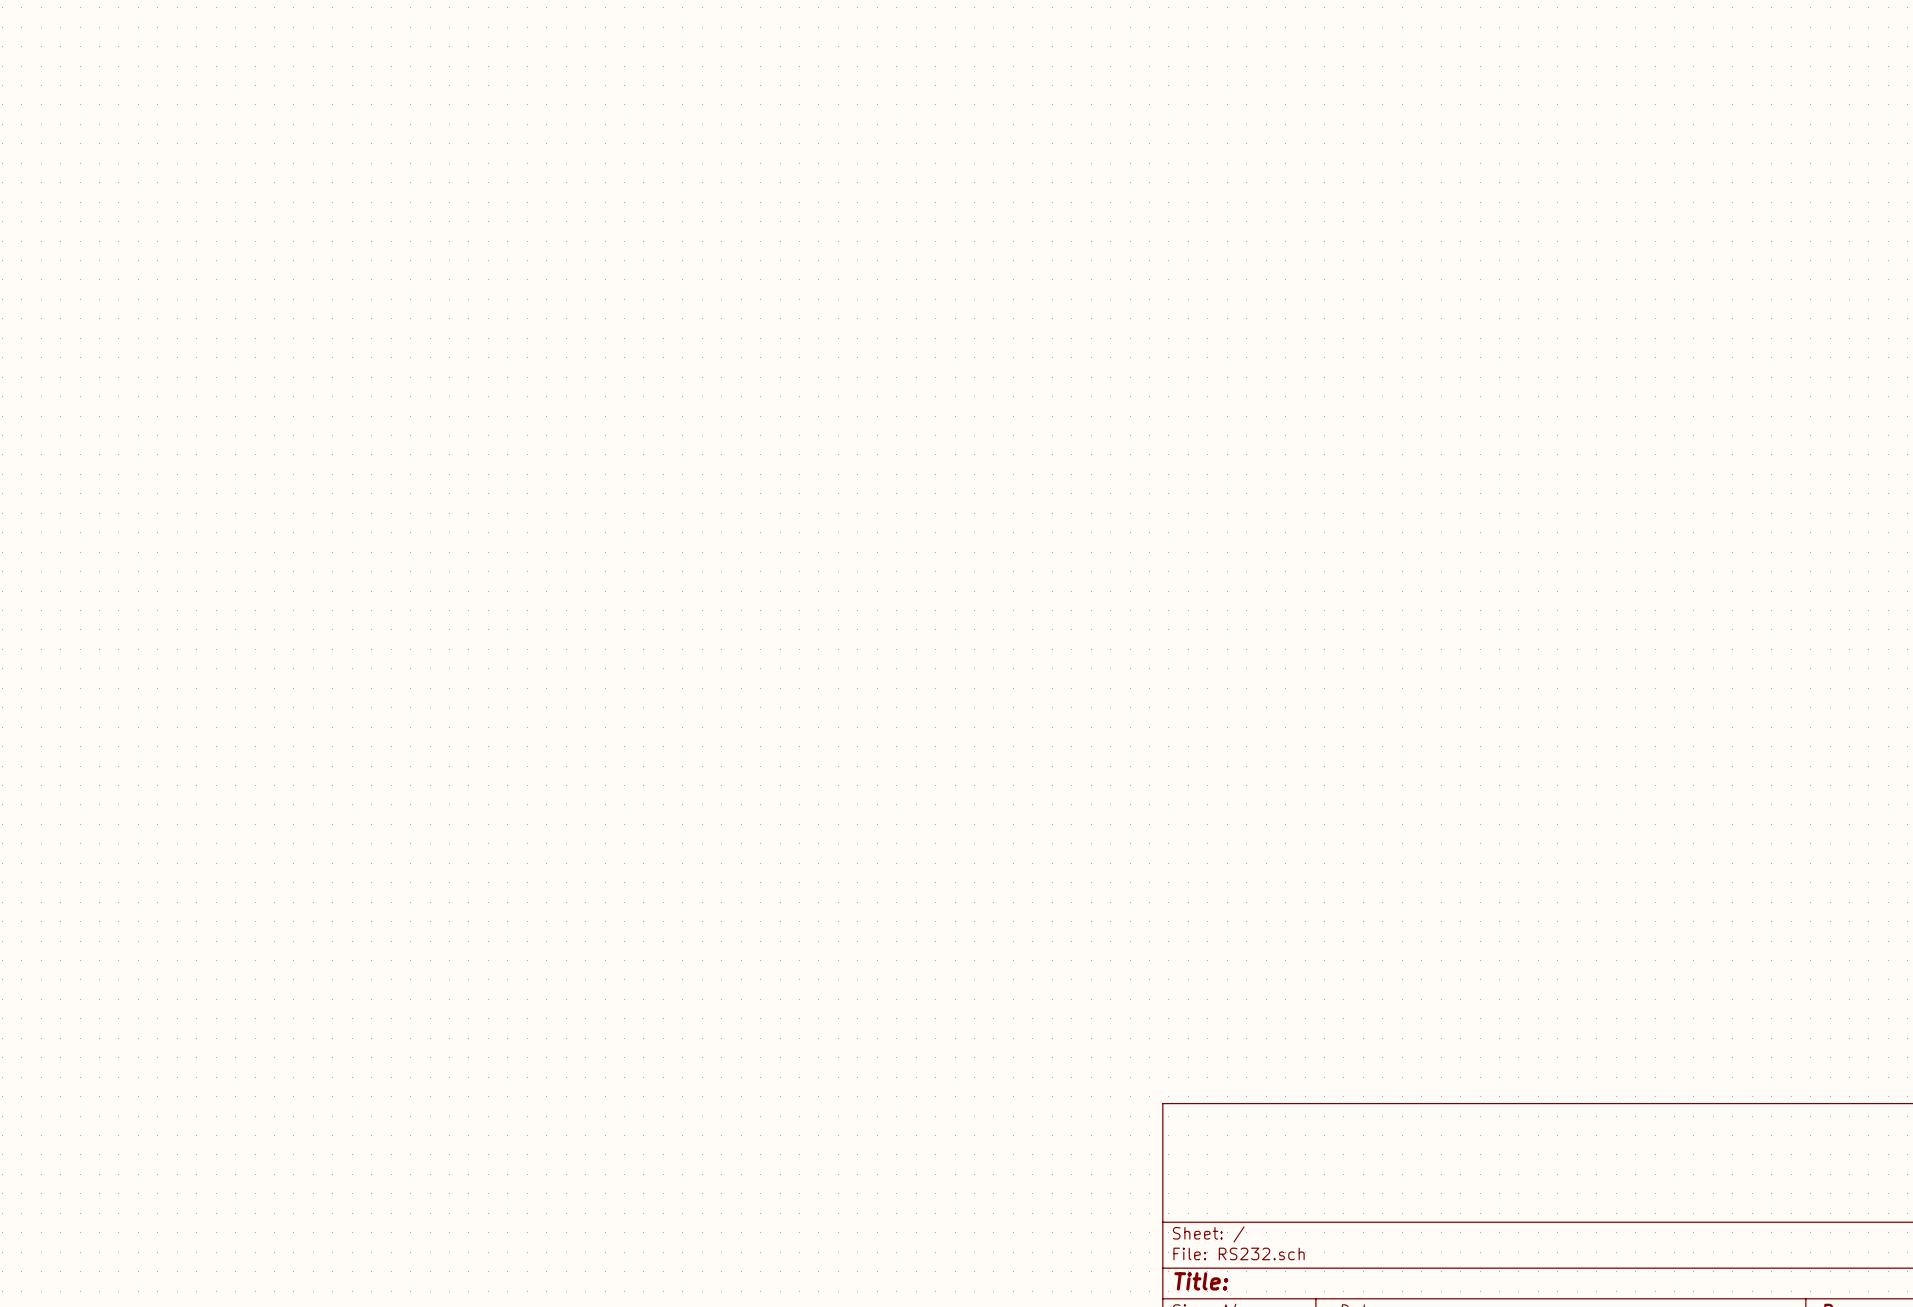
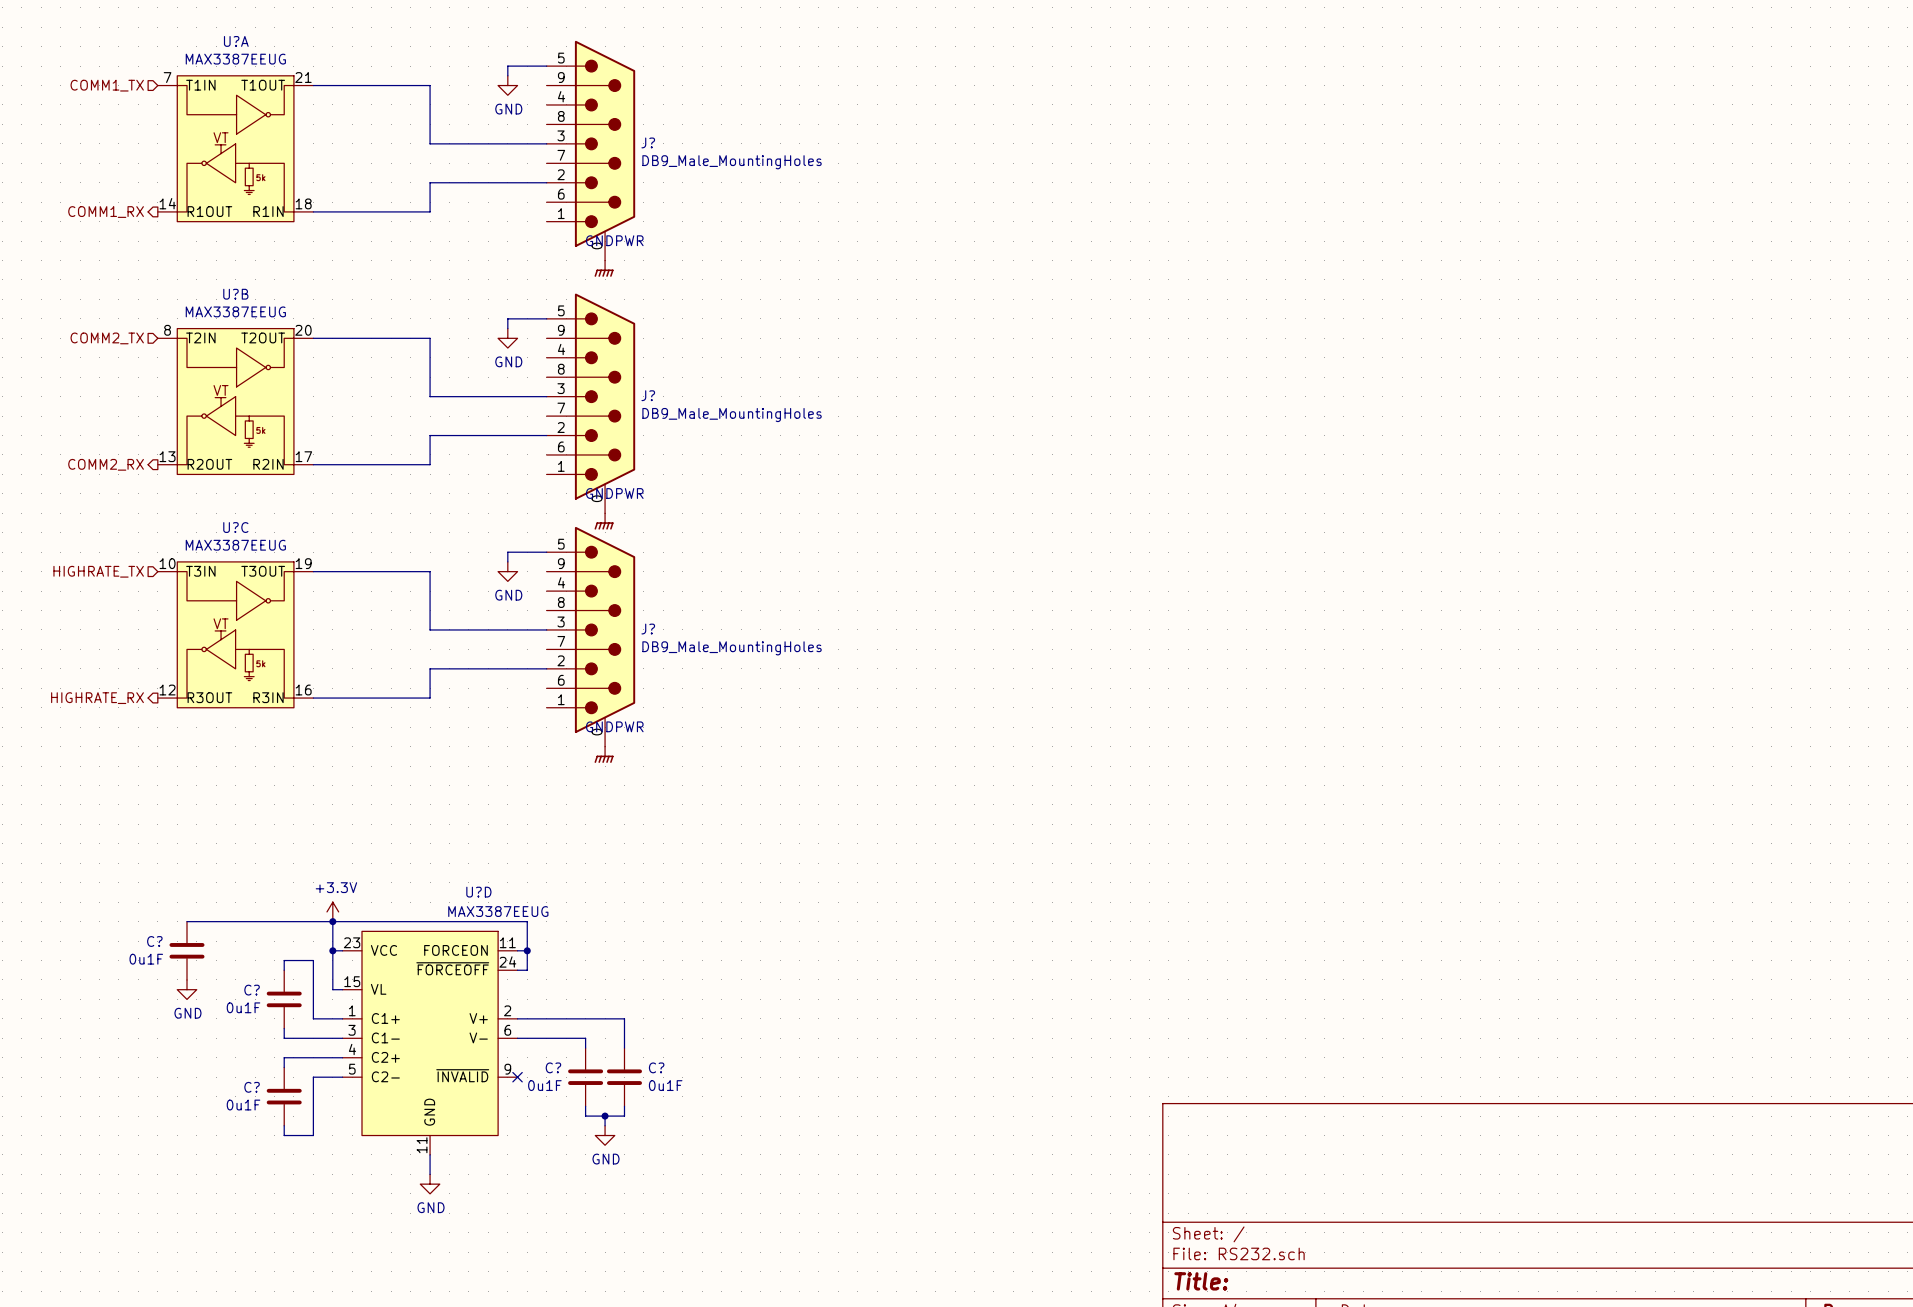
wire: none -> (546, 66) (507, 66) (507, 75)
hierarchical label: none -> COMM1_TX (107, 85)
wire: none -> (313, 85) (430, 85) (430, 143) (546, 143)
power symbol: none -> GND (507, 85)
U?A: none -> MAX3387EEUG (235, 148)
J?: none -> DB9_Male_MountingHoles (590, 150)
wire: none -> (546, 182) (430, 182) (430, 211) (313, 211)
hierarchical label: none -> COMM1_RX (106, 212)
power symbol: none -> GNDPWR (604, 268)
wire: none -> (546, 318) (507, 318) (507, 328)
hierarchical label: none -> COMM2_TX (107, 338)
wire: none -> (313, 338) (430, 338) (430, 396) (546, 396)
power symbol: none -> GND (507, 338)
U?B: none -> MAX3387EEUG (235, 401)
J?: none -> DB9_Male_MountingHoles (590, 403)
wire: none -> (546, 435) (430, 435) (430, 464) (313, 464)
hierarchical label: none -> COMM2_RX (106, 464)
power symbol: none -> GNDPWR (604, 521)
wire: none -> (546, 552) (507, 552) (507, 561)
hierarchical label: none -> HIGHRATE_TX (98, 571)
wire: none -> (313, 571) (430, 571) (430, 629) (546, 629)
power symbol: none -> GND (507, 571)
U?C: none -> MAX3387EEUG (235, 634)
J?: none -> DB9_Male_MountingHoles (590, 636)
wire: none -> (546, 668) (430, 668) (430, 698) (313, 698)
hierarchical label: none -> HIGHRATE_RX (97, 698)
power symbol: none -> GNDPWR (604, 754)
power symbol: none -> +3.3V (332, 911)
wire: none -> (186, 921) (527, 921) (527, 970) (517, 970)
wire: none -> (332, 921) (332, 989) (342, 989)
junction: none -> (332, 921)
C?: none -> 0u1F (186, 950)
wire: none -> (332, 950) (342, 950)
junction: none -> (332, 950)
wire: none -> (517, 950) (527, 950)
junction: none -> (527, 950)
wire: none -> (284, 970) (284, 960) (313, 960) (313, 1018) (342, 1018)
power symbol: none -> GND (186, 989)
C?: none -> 0u1F (284, 999)
wire: none -> (517, 1018) (624, 1018) (624, 1048)
wire: none -> (284, 1028) (284, 1038) (342, 1038)
wire: none -> (517, 1038) (585, 1038) (585, 1048)
U?D: none -> MAX3387EEUG (430, 1043)
wire: none -> (342, 1057) (284, 1057) (284, 1067)
wire: none -> (342, 1077) (313, 1077) (313, 1135) (284, 1135) (284, 1125)
no-connect mark: none -> (517, 1077)
C?: none -> 0u1F (585, 1077)
C?: none -> 0u1F (624, 1077)
C?: none -> 0u1F (284, 1096)
wire: none -> (585, 1106) (585, 1116) (624, 1116) (624, 1106)
wire: none -> (605, 1116) (605, 1125)
junction: none -> (605, 1116)
power symbol: none -> GND (605, 1135)
wire: none -> (430, 1154) (430, 1174)
power symbol: none -> GND (430, 1184)

